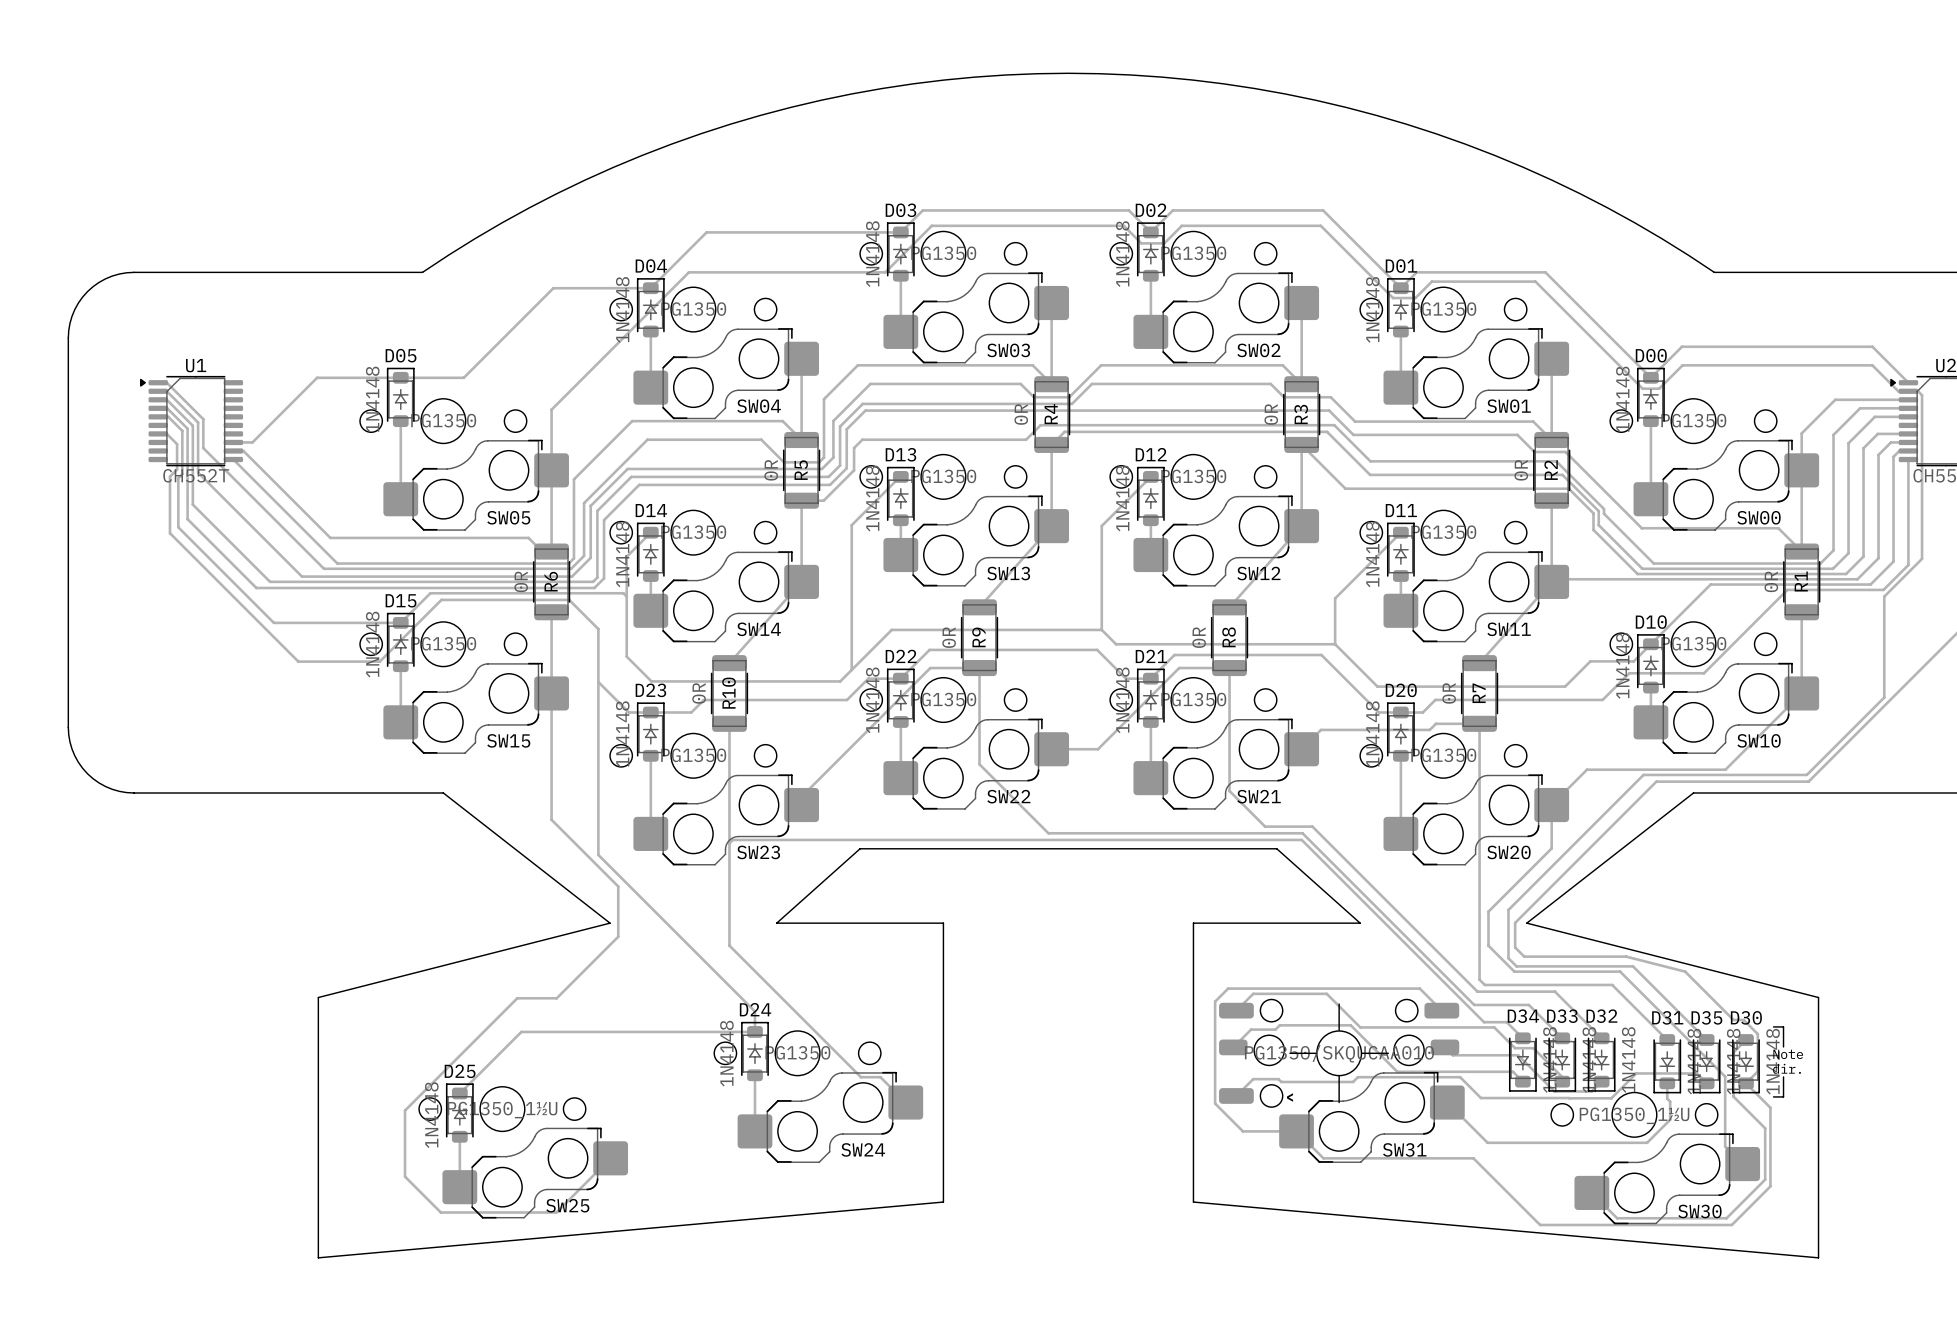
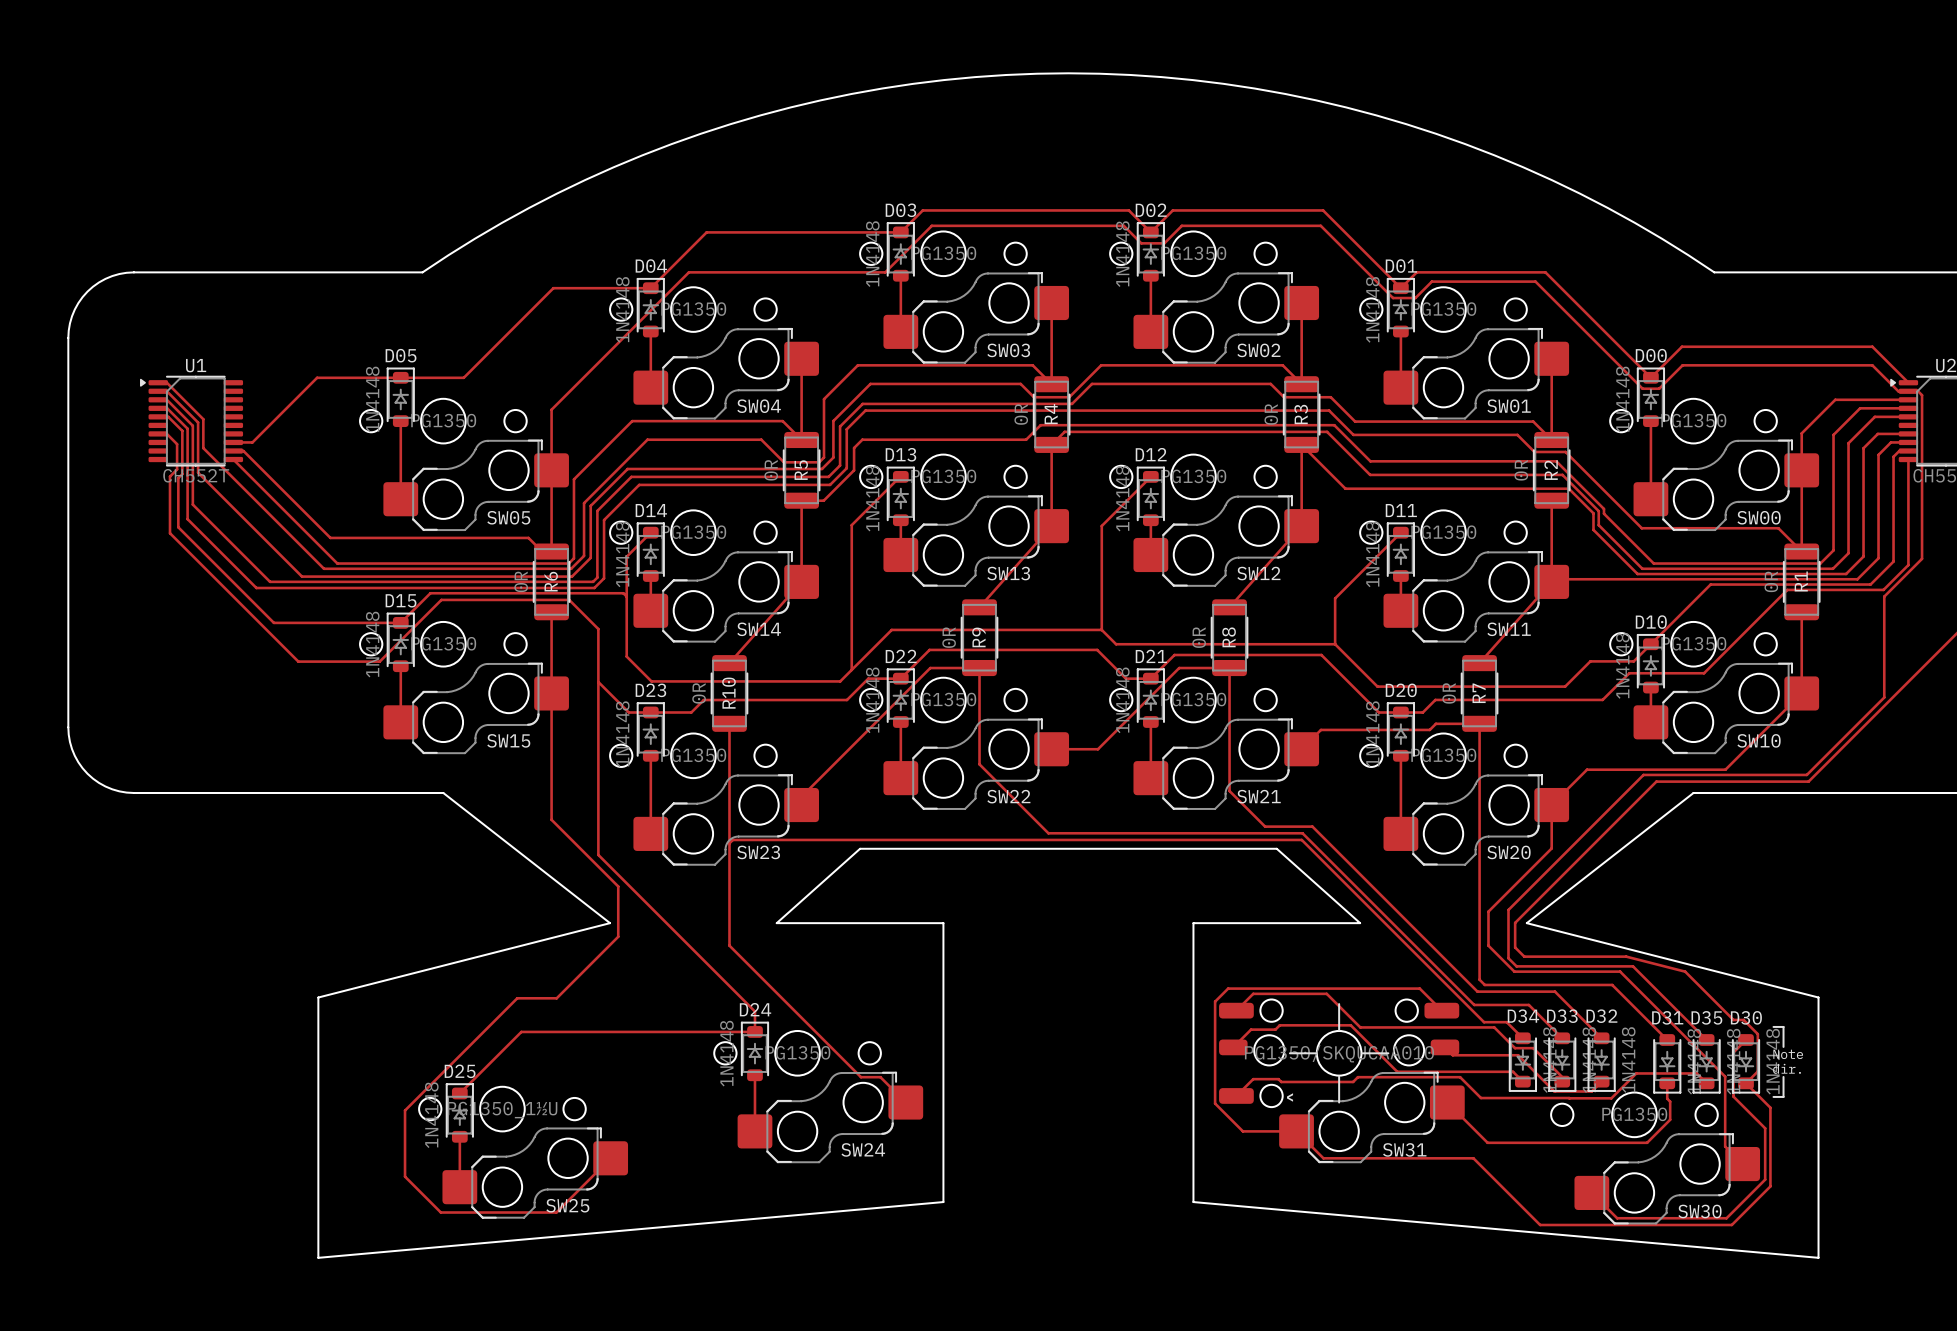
SW30 value: PG1350_1½U (1634, 1115) -> PG1350 (1634, 1114)

